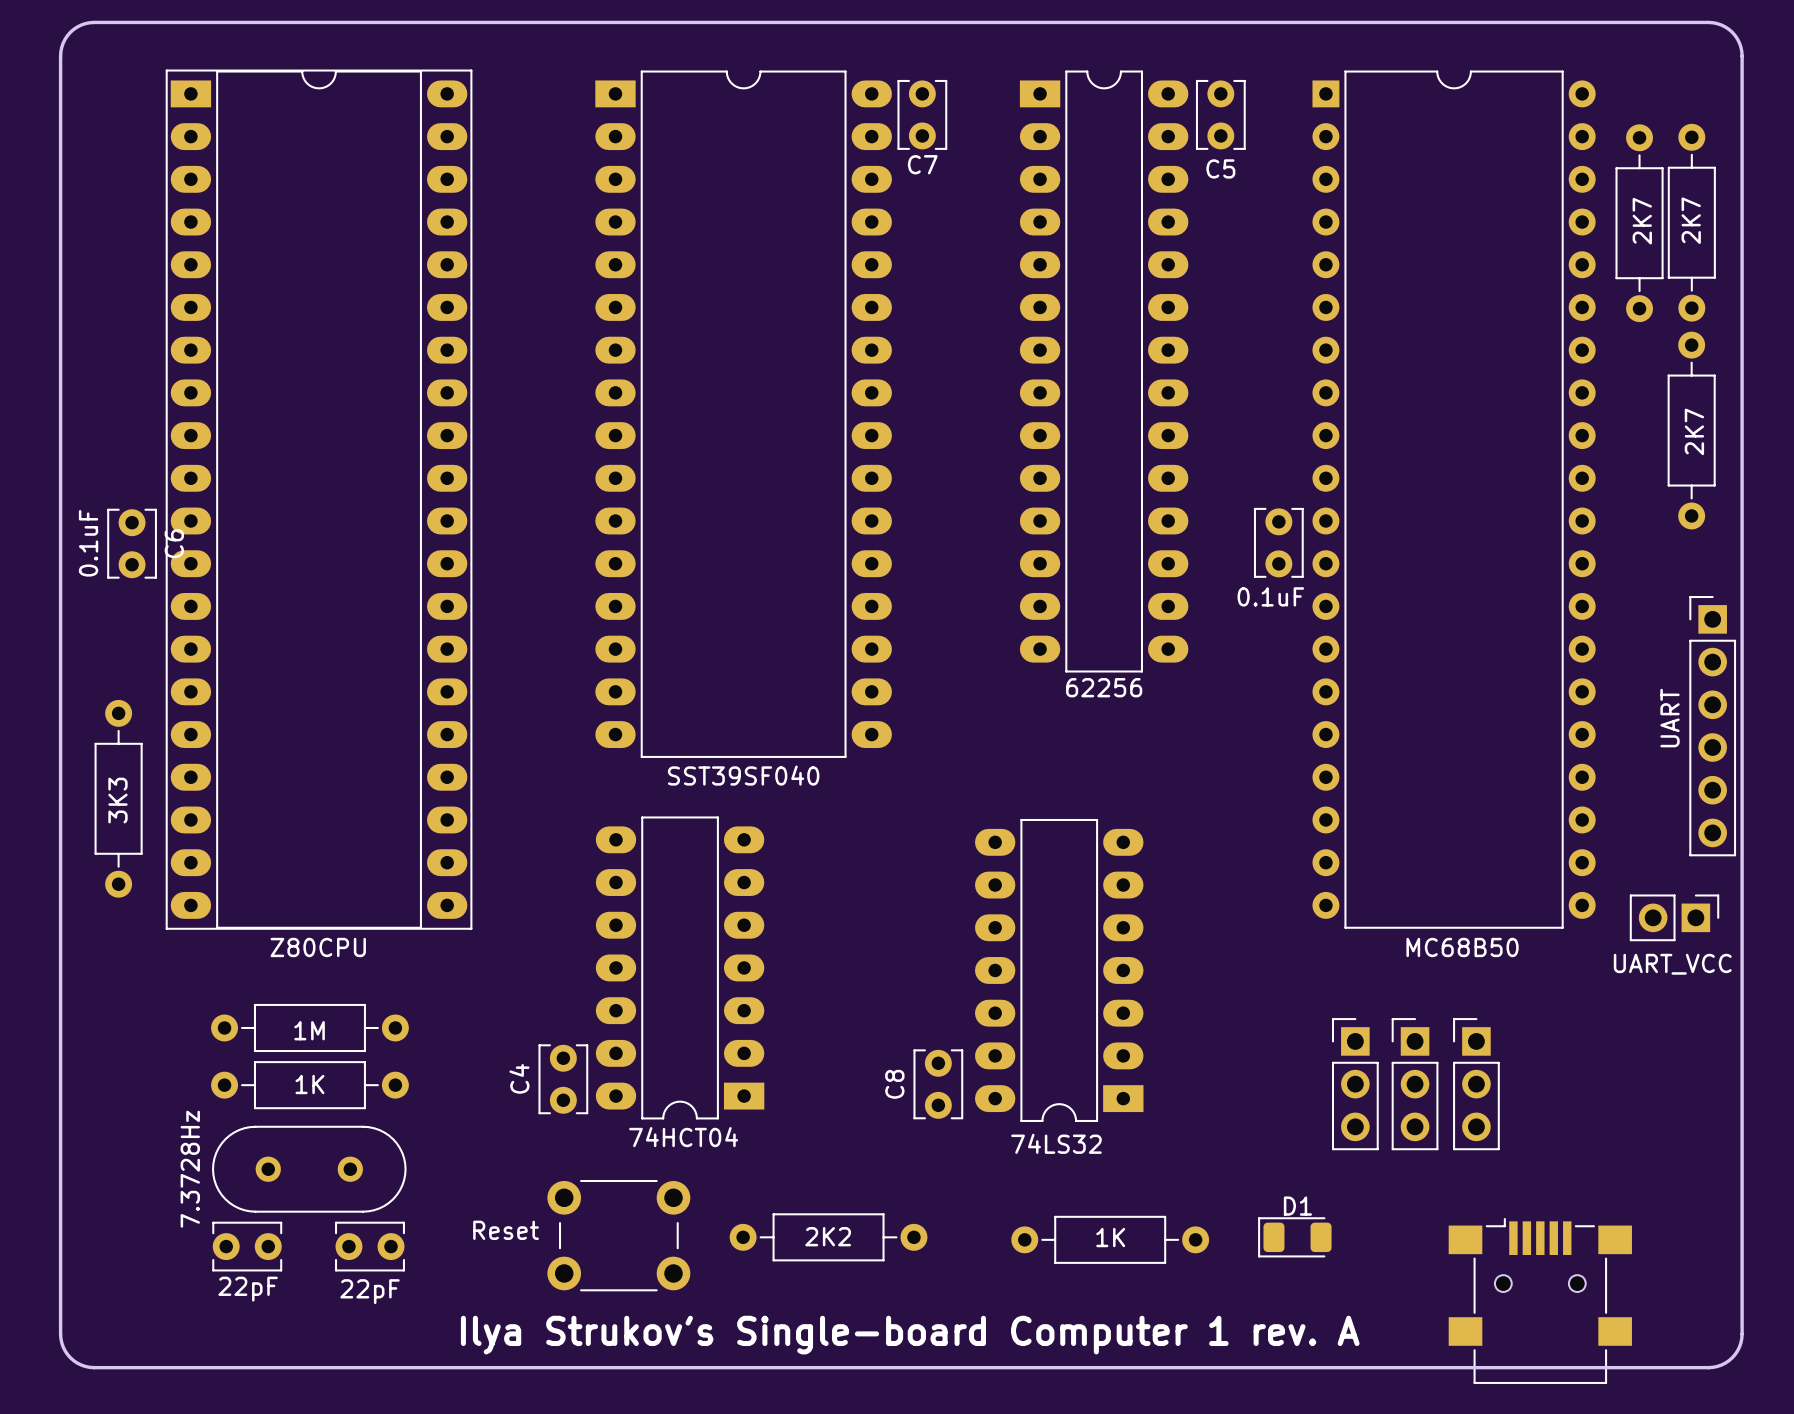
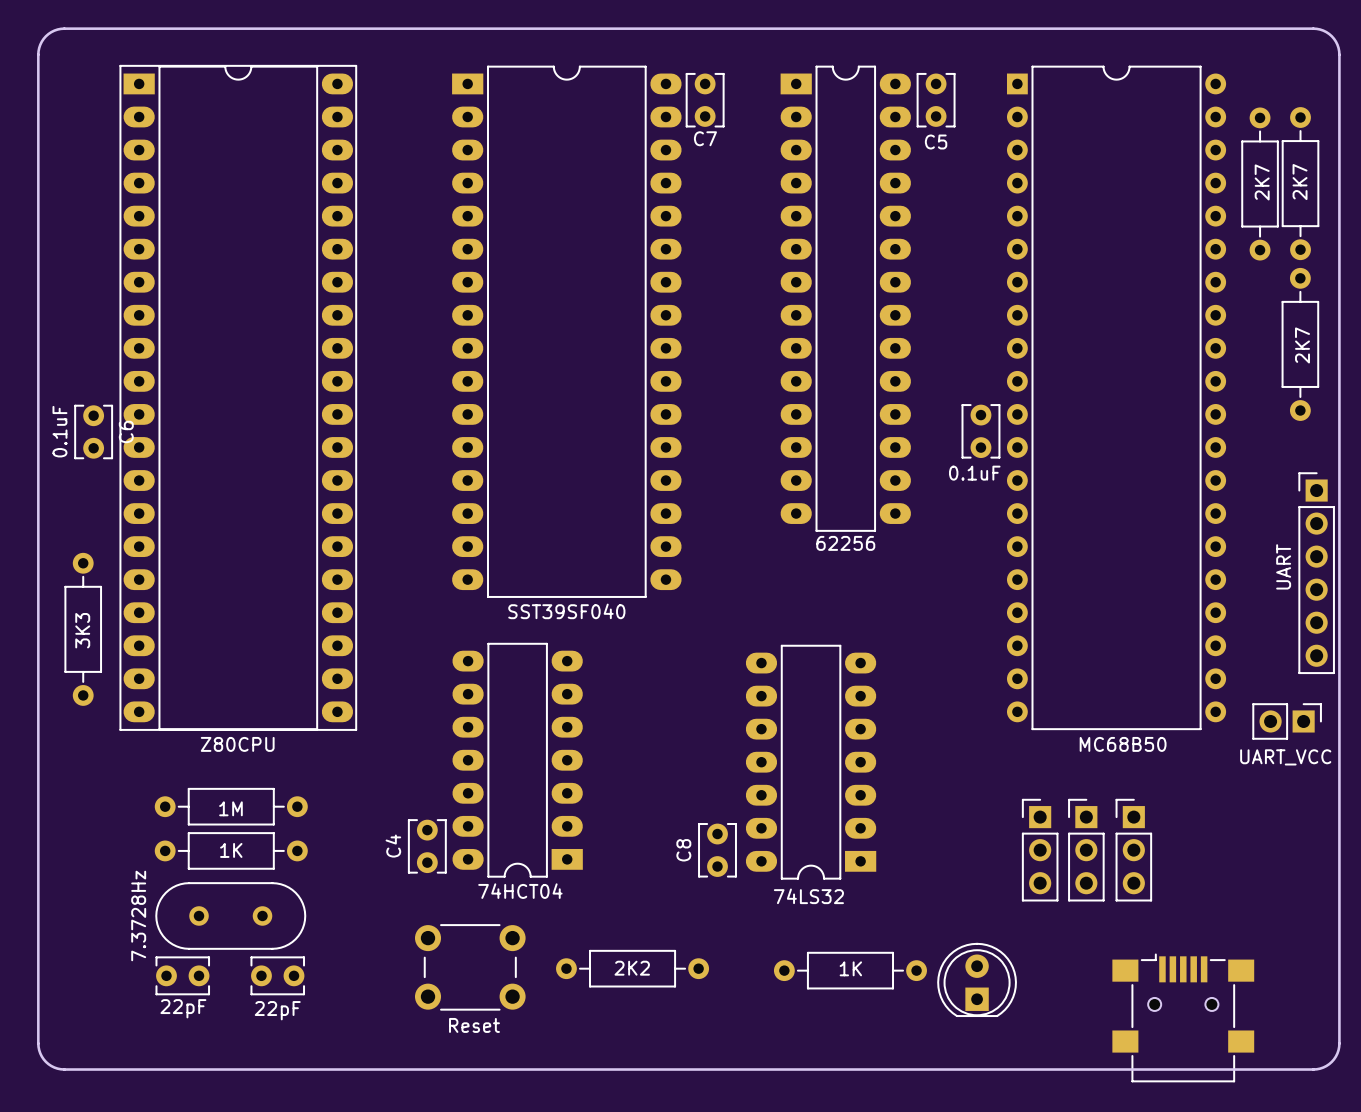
part value position: Reset (506, 1230) -> Reset (474, 1025)
D1: (1294, 1237) -> none
part: none -> (977, 979)
text: Ilya Strukov's Single-board Computer 1 rev. A (910, 1335) -> none

